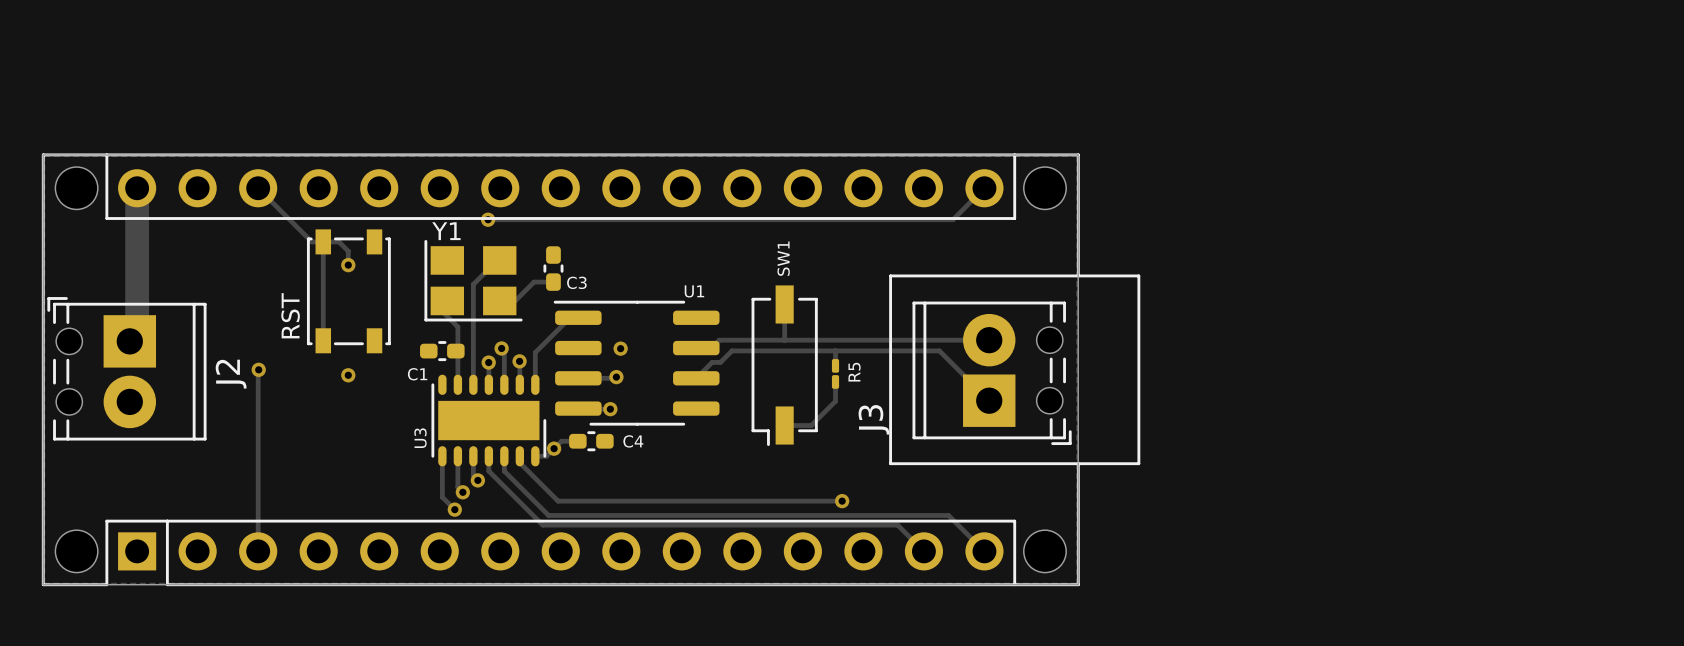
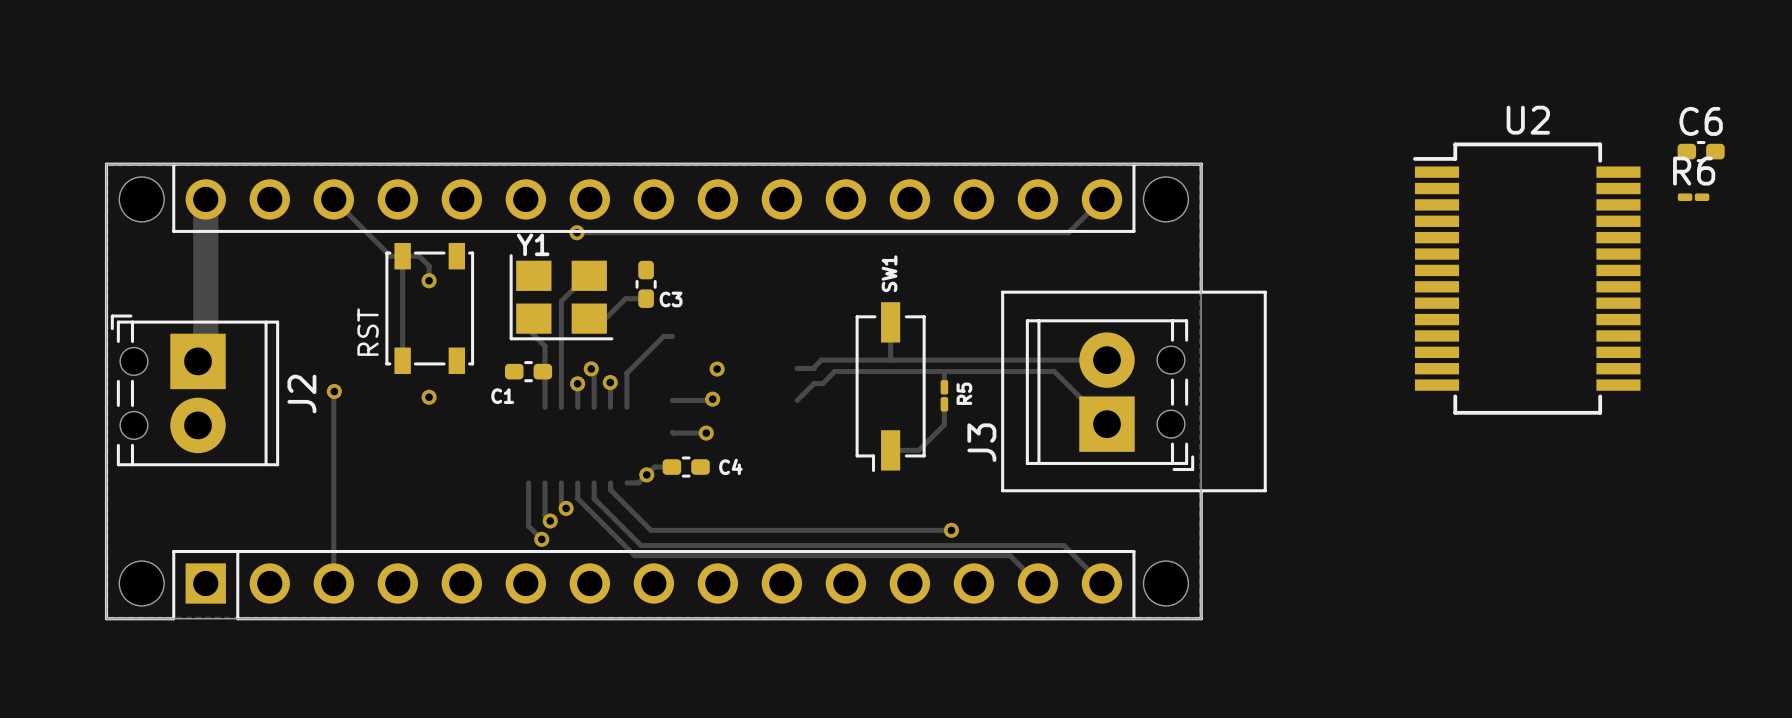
C6: none -> (1701, 151)
R6: none -> (1693, 197)
U2: none -> (1526, 278)
U1: (636, 363) -> none
U3: (488, 420) -> none

